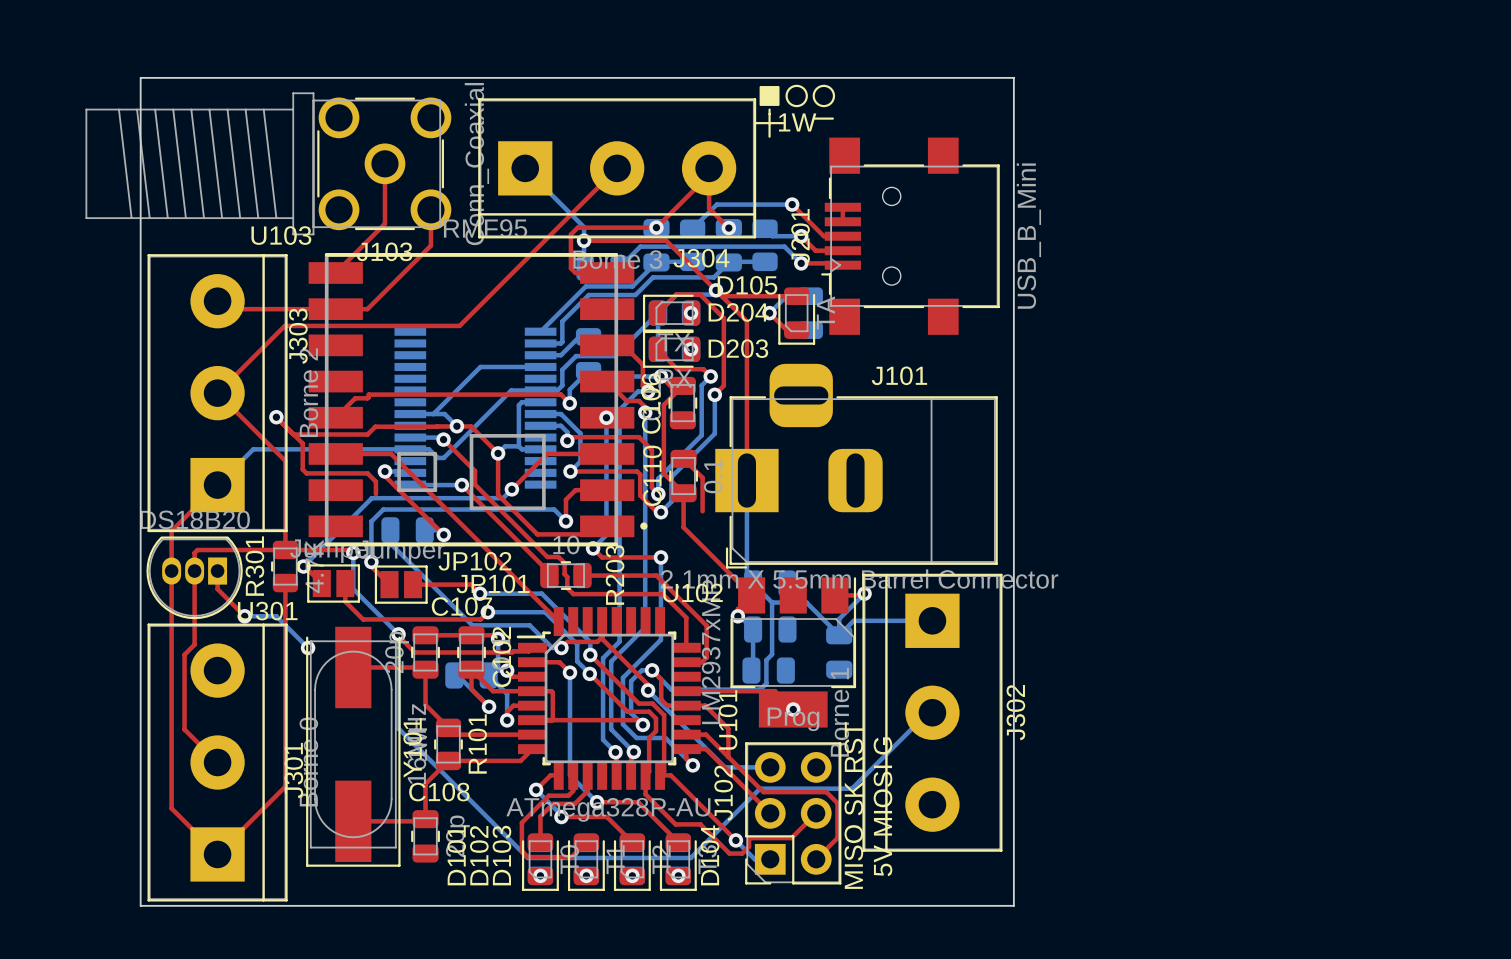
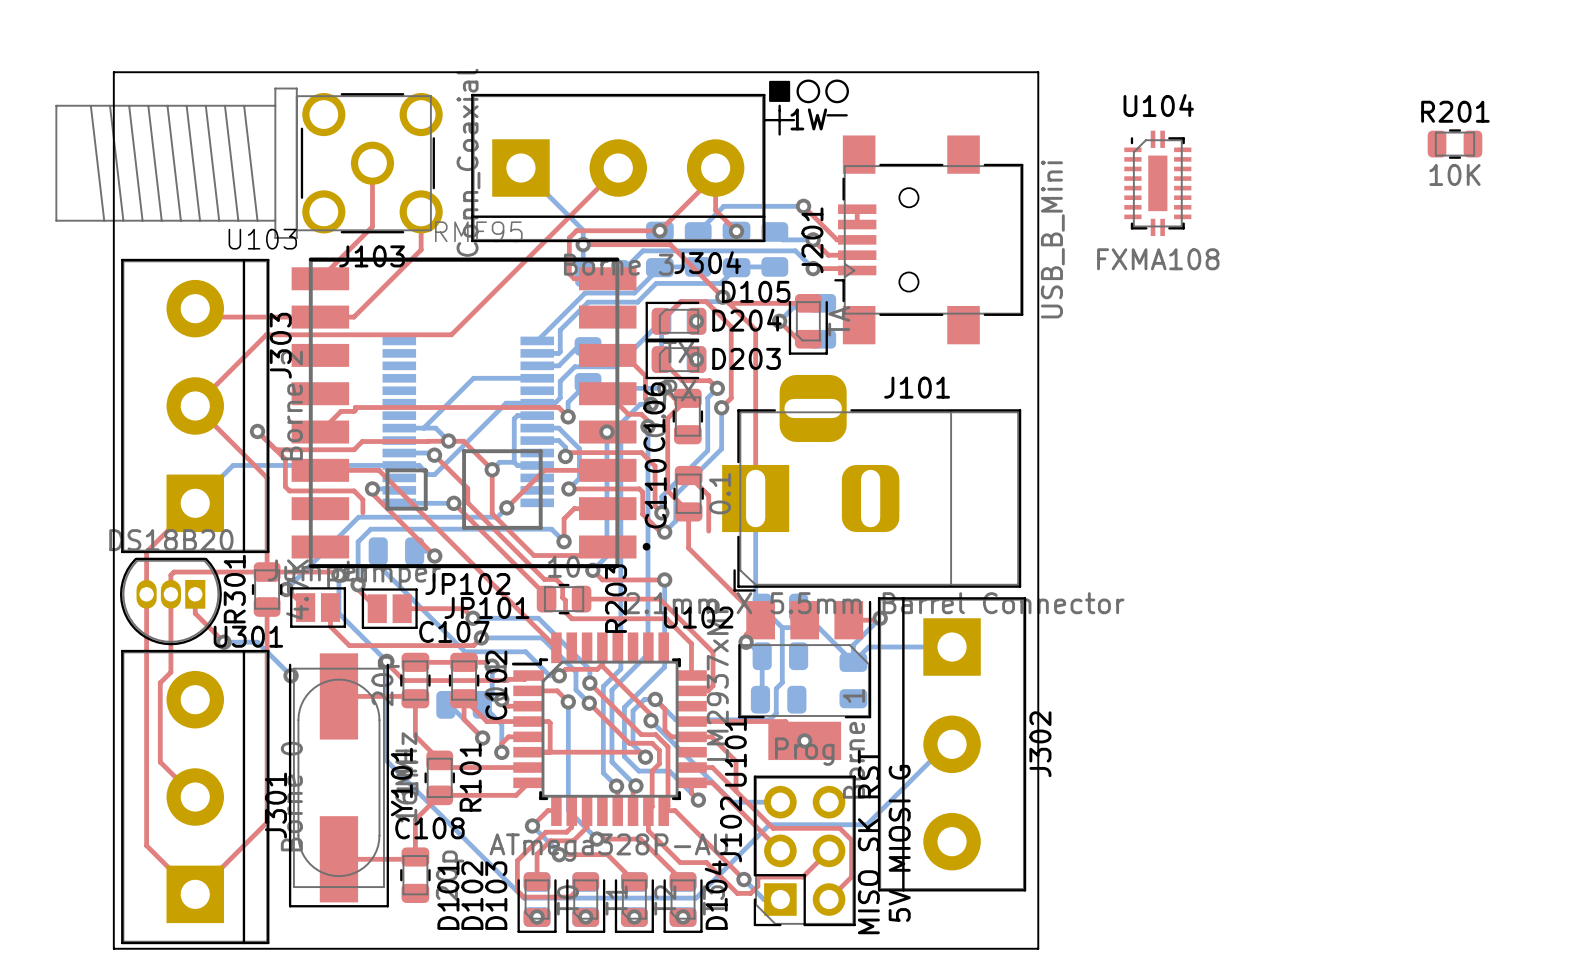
R201: none -> 10K (1454, 144)
U104: none -> FXMA108 (1157, 183)

